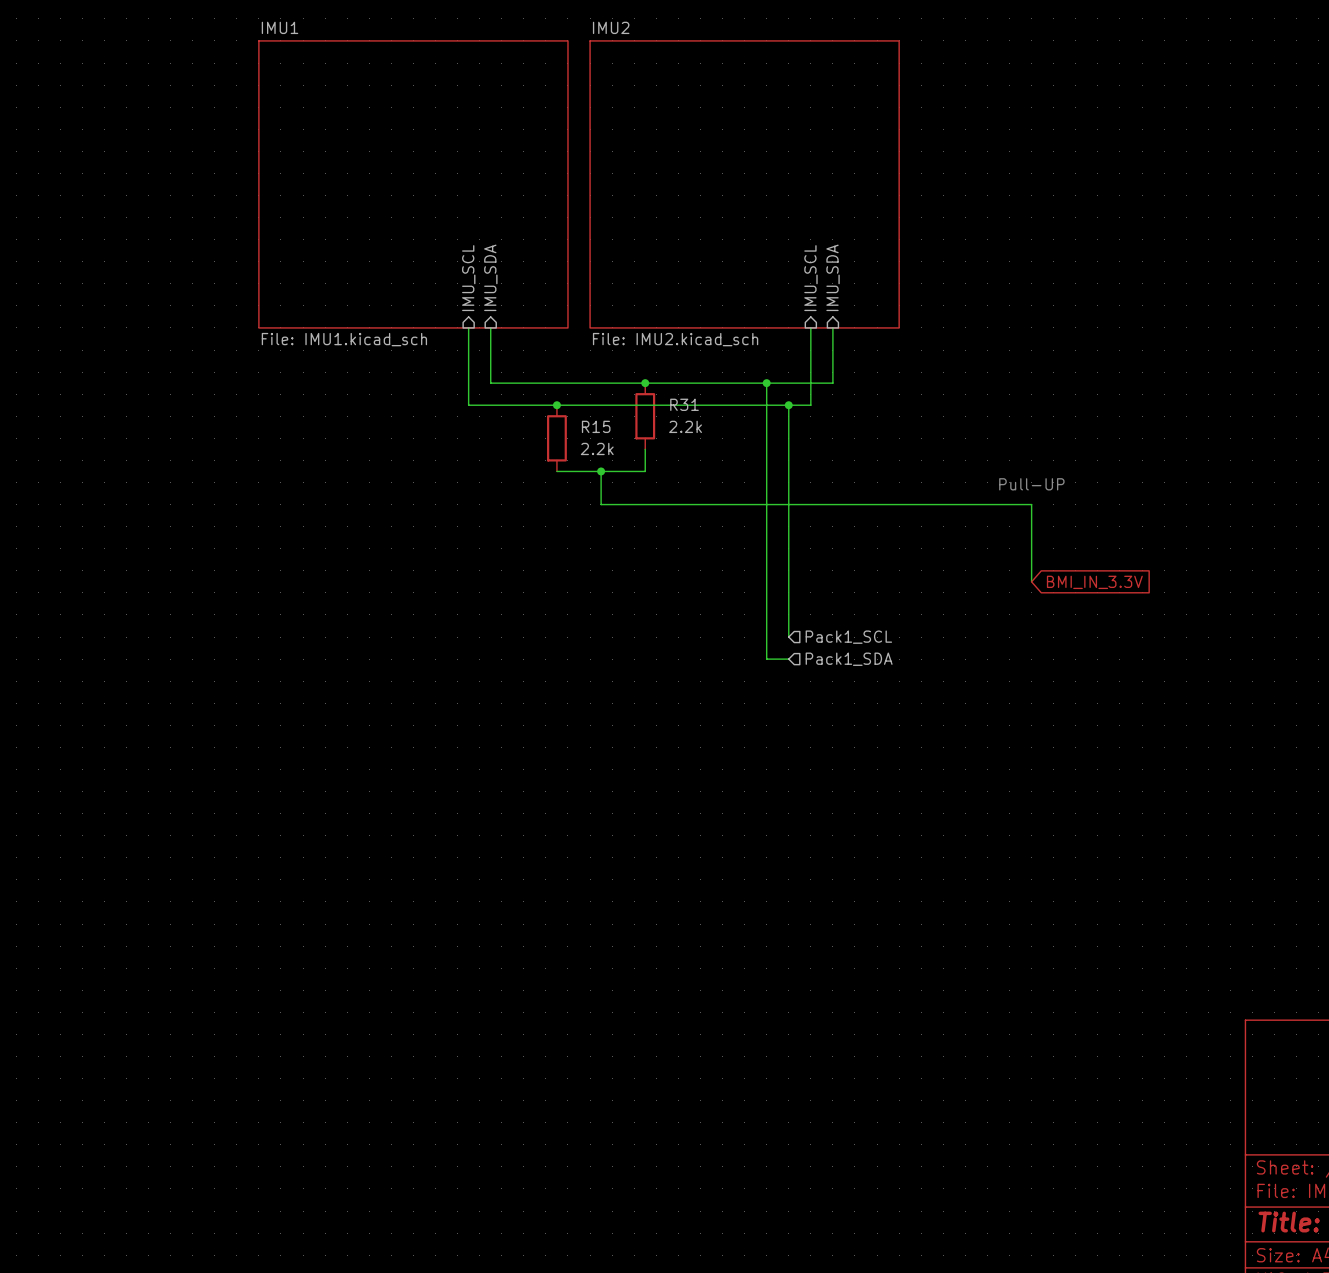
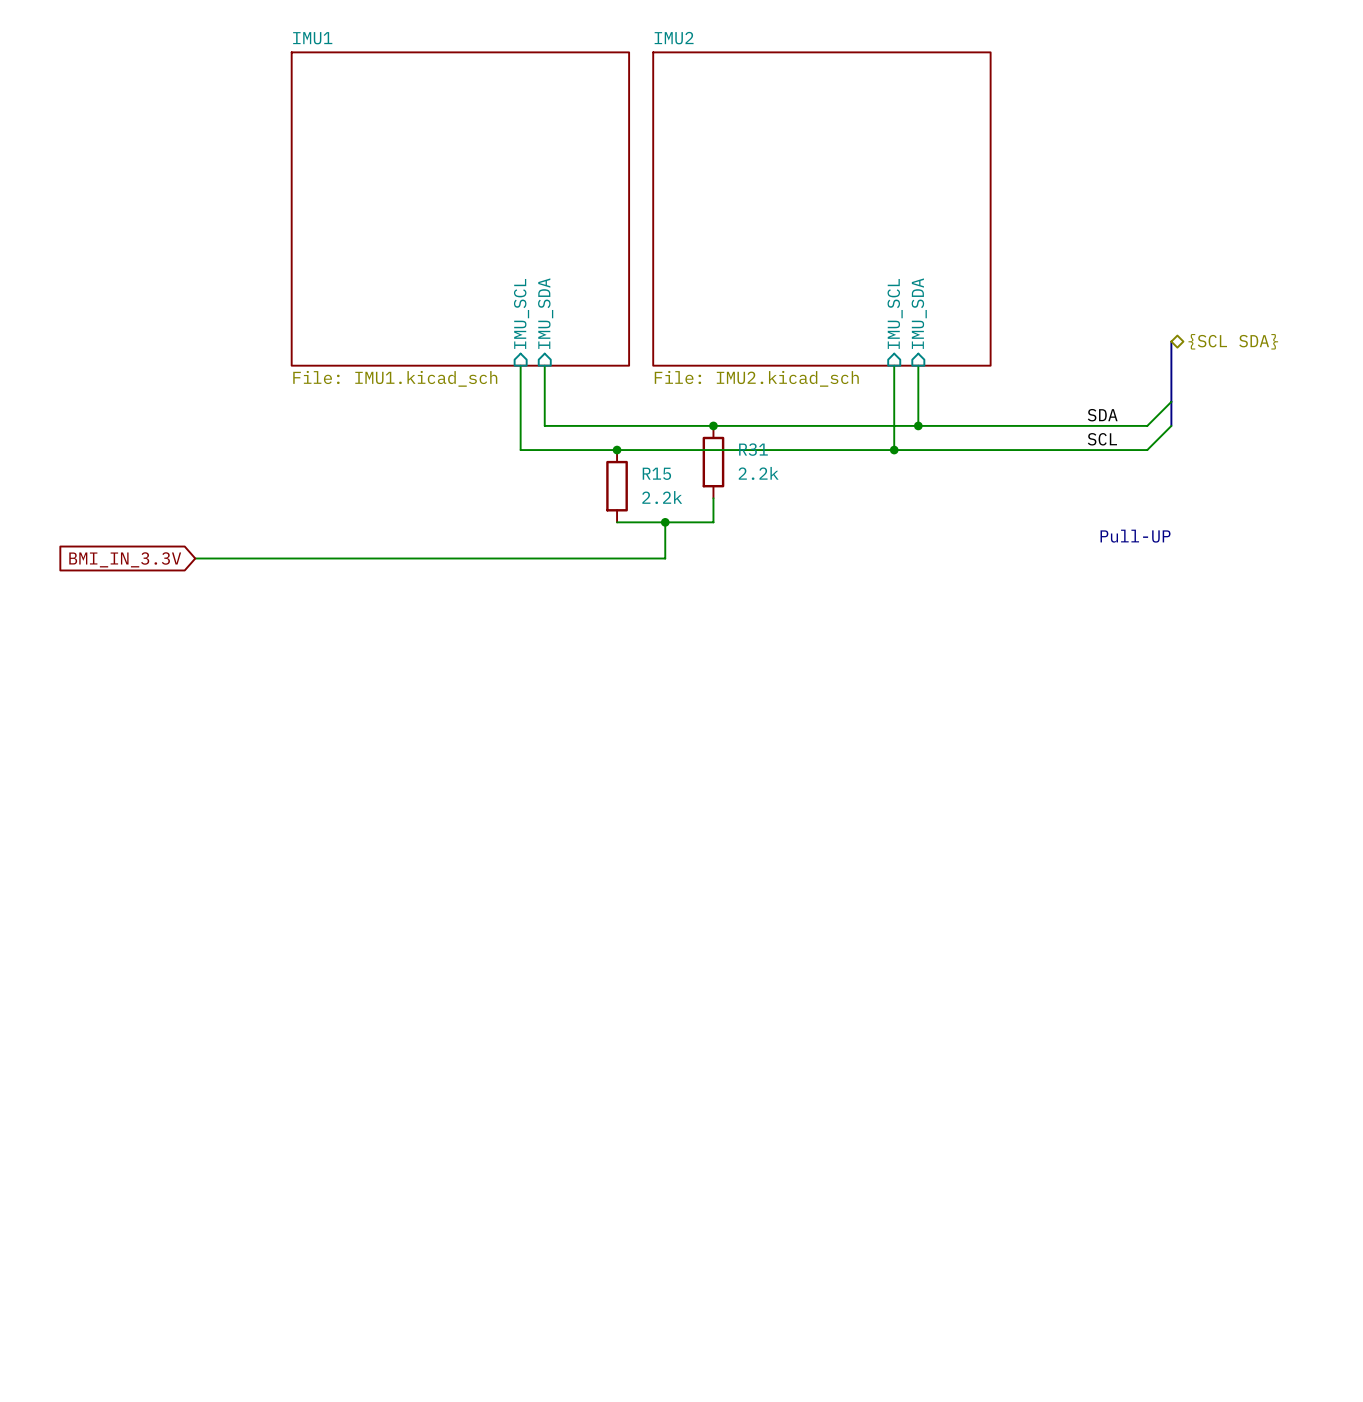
bus: none -> (1171, 341) (1171, 425)
hierarchical label: none -> {SCL SDA} (1233, 341)
wire: none -> (1171, 401) (1147, 425) (918, 425)
label: none -> SDA (1102, 415)
wire: (766, 383) (766, 659) (788, 659) -> none
junction: (766, 383) -> none
junction: none -> (918, 425)
wire: none -> (1171, 425) (1147, 450) (894, 450)
label: none -> SCL (1102, 439)
wire: (788, 405) (788, 637) -> none
junction position: (788, 405) -> (894, 450)
wire: (601, 504) (1031, 504) (1031, 581) -> (665, 558) (195, 558)
global label: none -> BMI_IN_3.3V (125, 559)
global label: BMI_IN_3.3V (1094, 582) -> none
hierarchical label: Pack1_SCL (848, 637) -> none
hierarchical label: Pack1_SDA (849, 659) -> none

